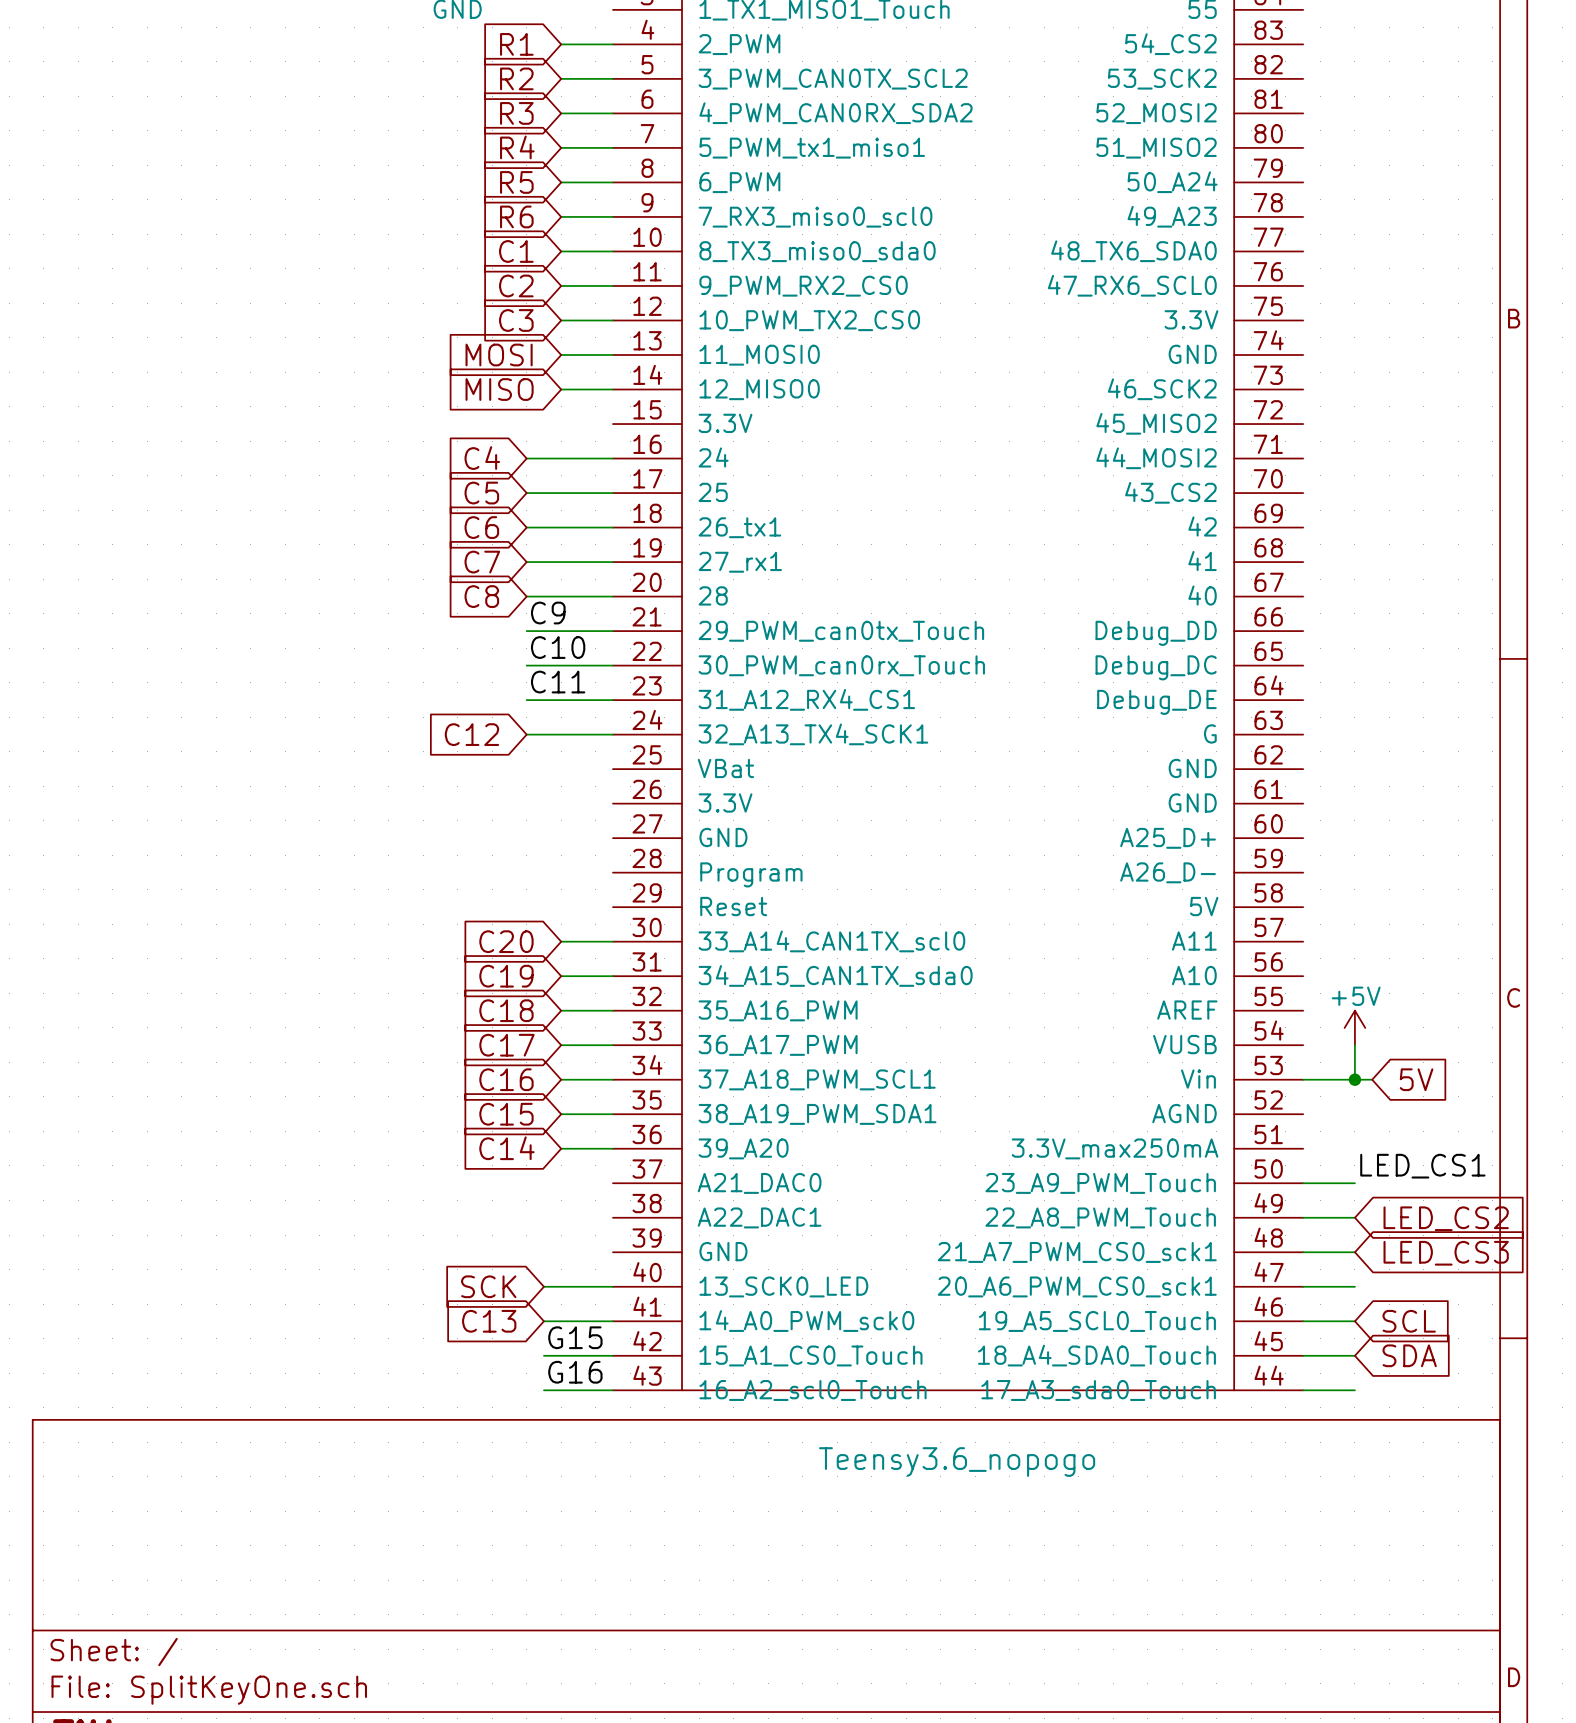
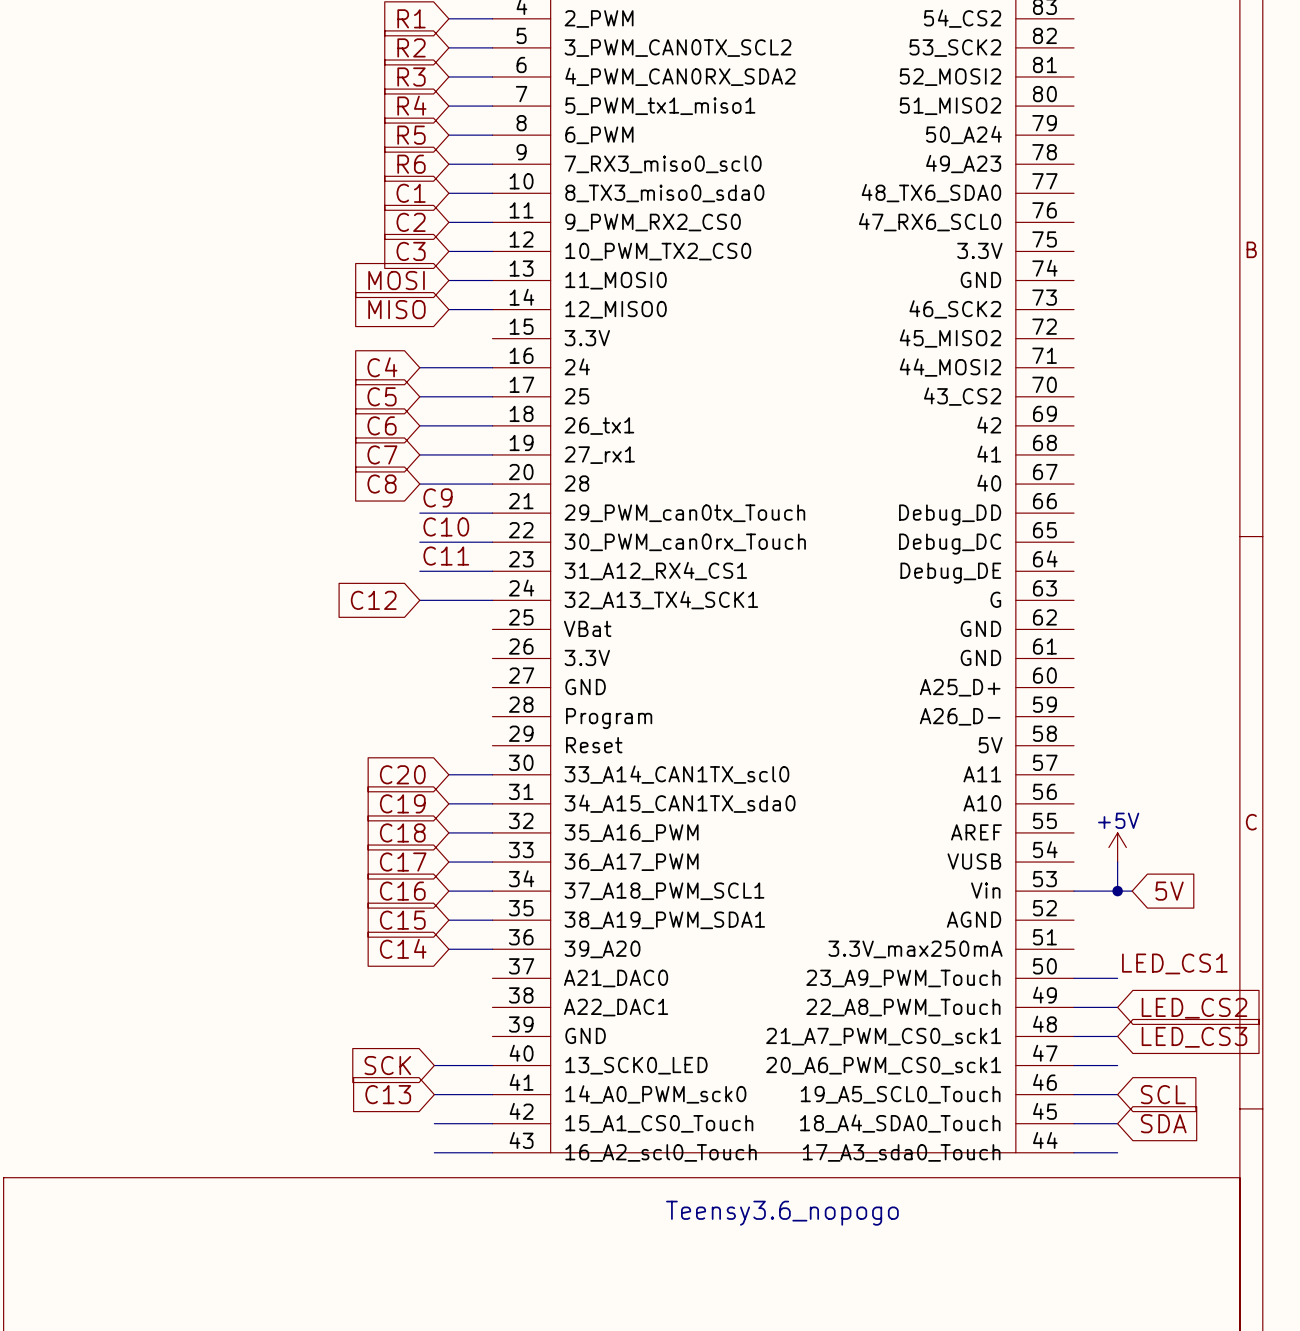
label: G15 (575, 1337) -> none
label: G16 (575, 1372) -> none

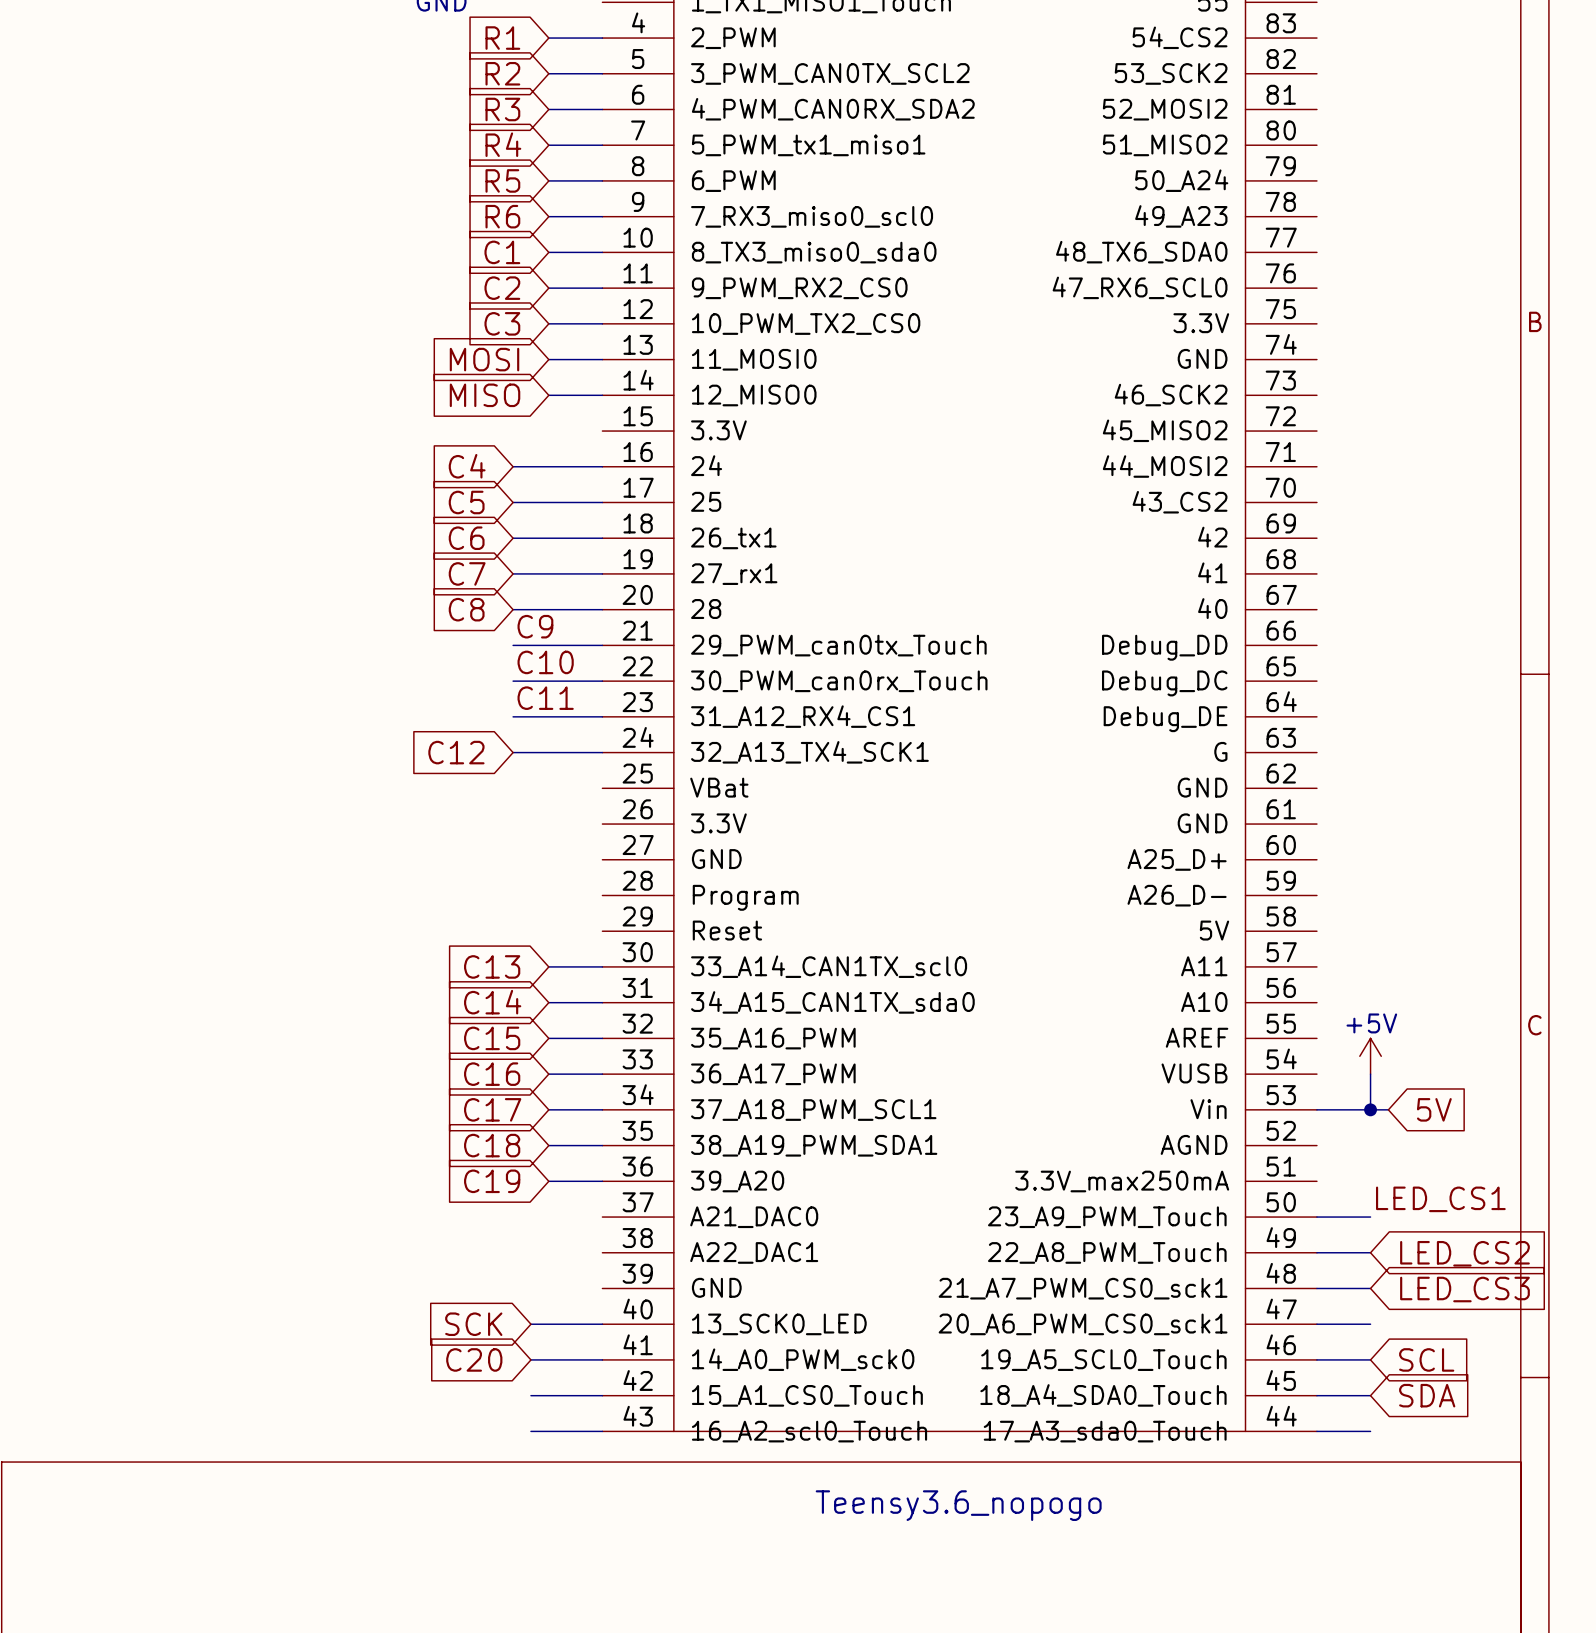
global label: C20 (402, 774) -> C13 (492, 966)
global label: C19 (402, 803) -> C14 (492, 1002)
global label: C18 (402, 832) -> C15 (492, 1038)
global label: C17 (403, 862) -> C16 (492, 1074)
global label: C16 (402, 891) -> C17 (492, 1109)
global label: C15 (402, 920) -> C18 (492, 1145)
global label: C14 (403, 948) -> C19 (492, 1181)
global label: C13 (388, 1094) -> C20 (474, 1359)

